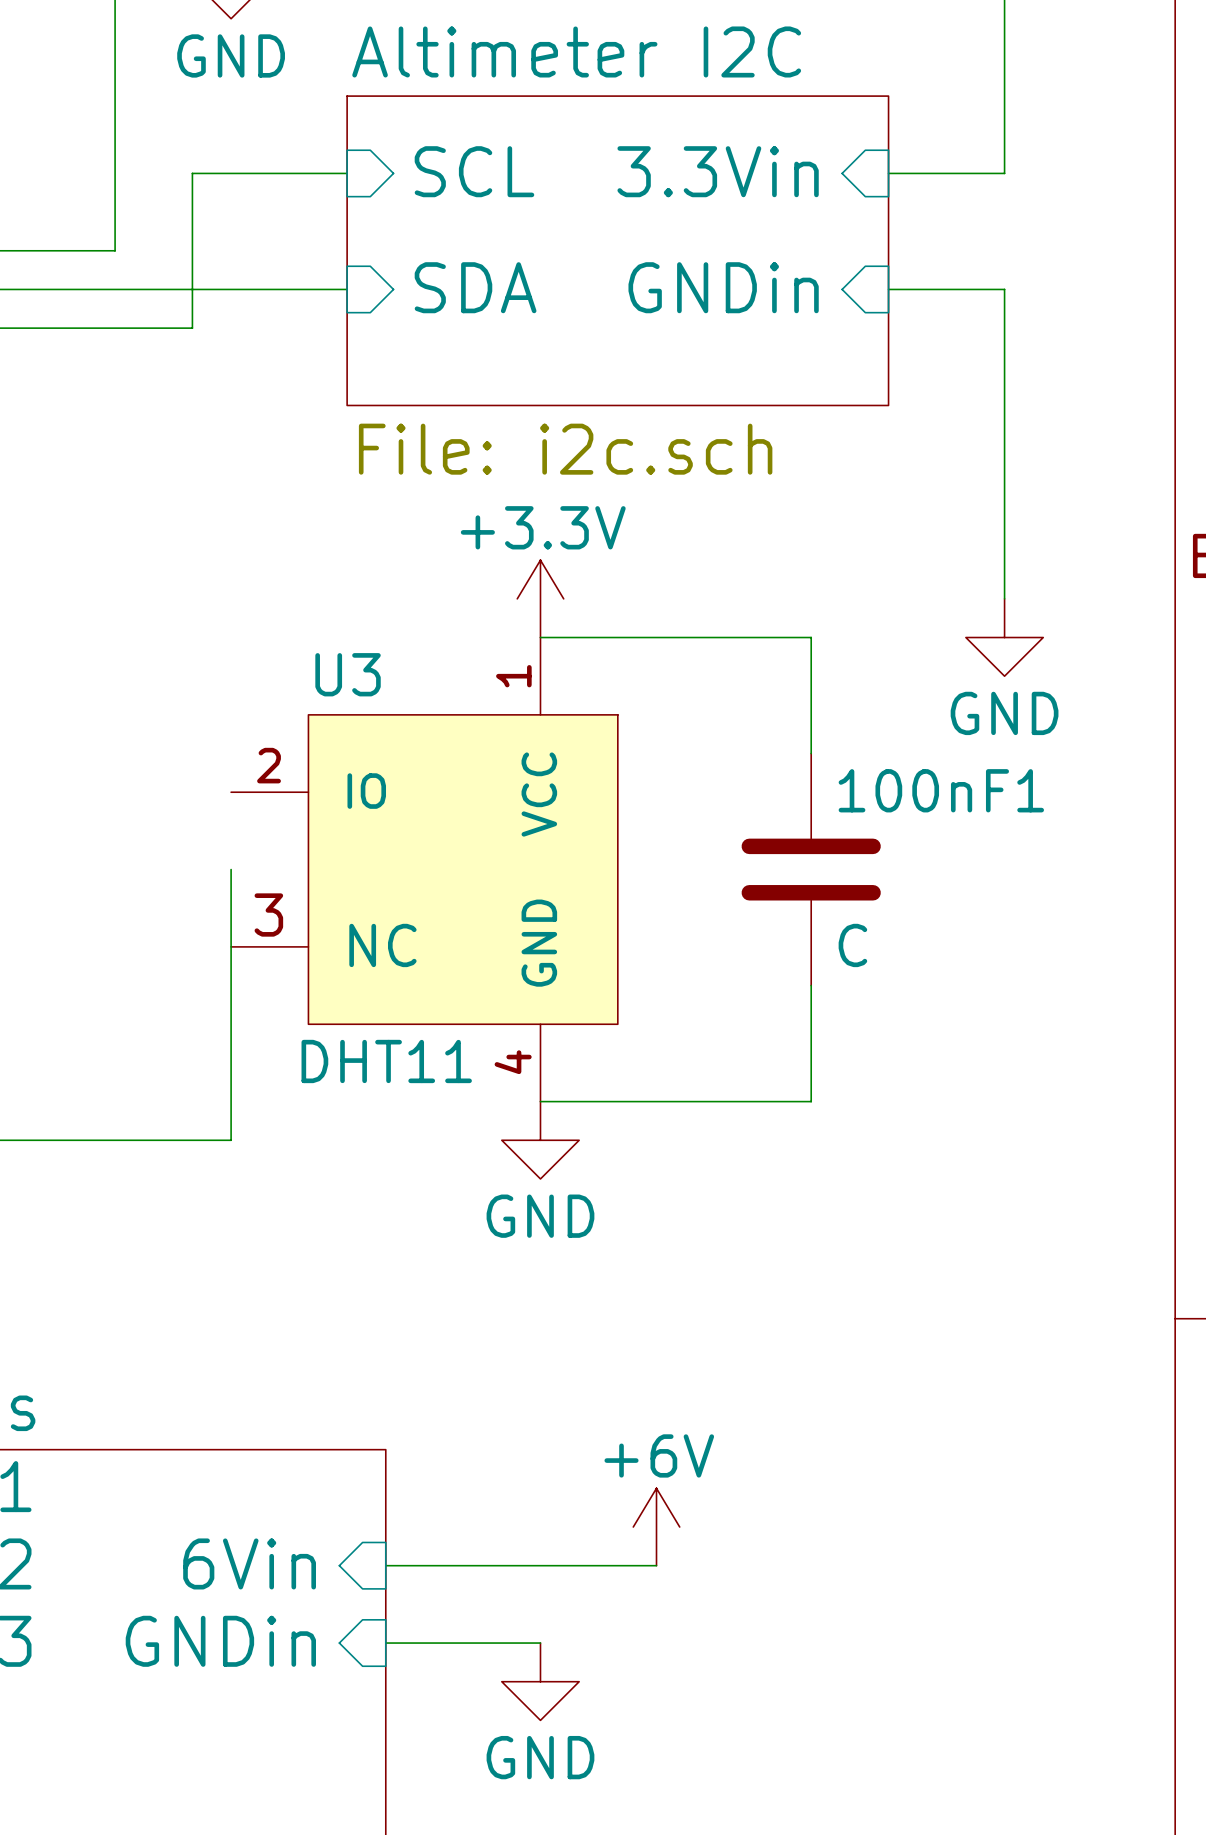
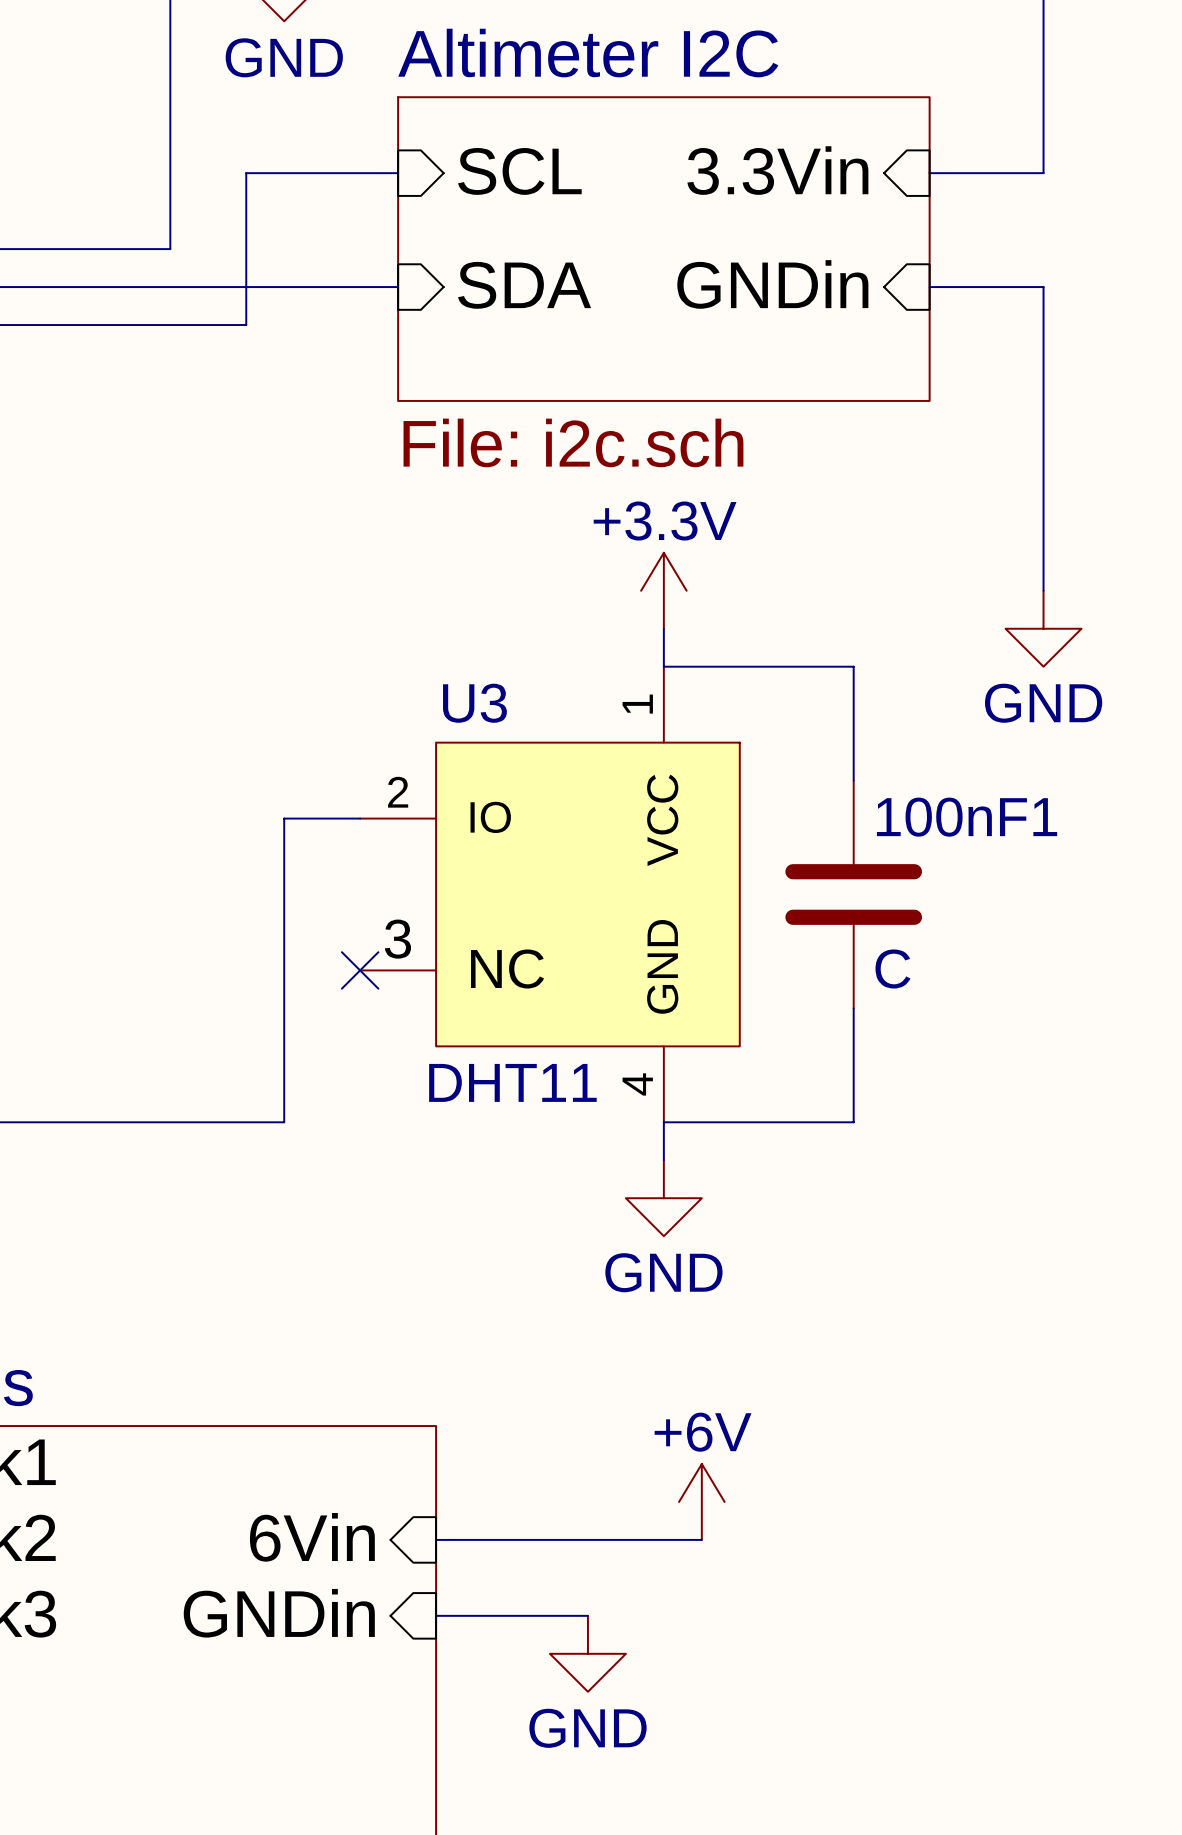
power symbol position: +3.3V (540, 598) -> +3.3V (663, 590)
wire: (540, 637) (811, 637) (811, 676) -> (663, 628) (663, 666) (853, 666)
wire: none -> (360, 818) (284, 818) (284, 856)
U3 position: (424, 869) -> (549, 894)
100nF1 position: (811, 869) -> (853, 894)
no-connect mark: none -> (360, 970)
wire: (540, 1101) (811, 1101) -> (663, 1160) (663, 1122) (853, 1122) (853, 1084)
power symbol position: GND (540, 1140) -> GND (663, 1198)

